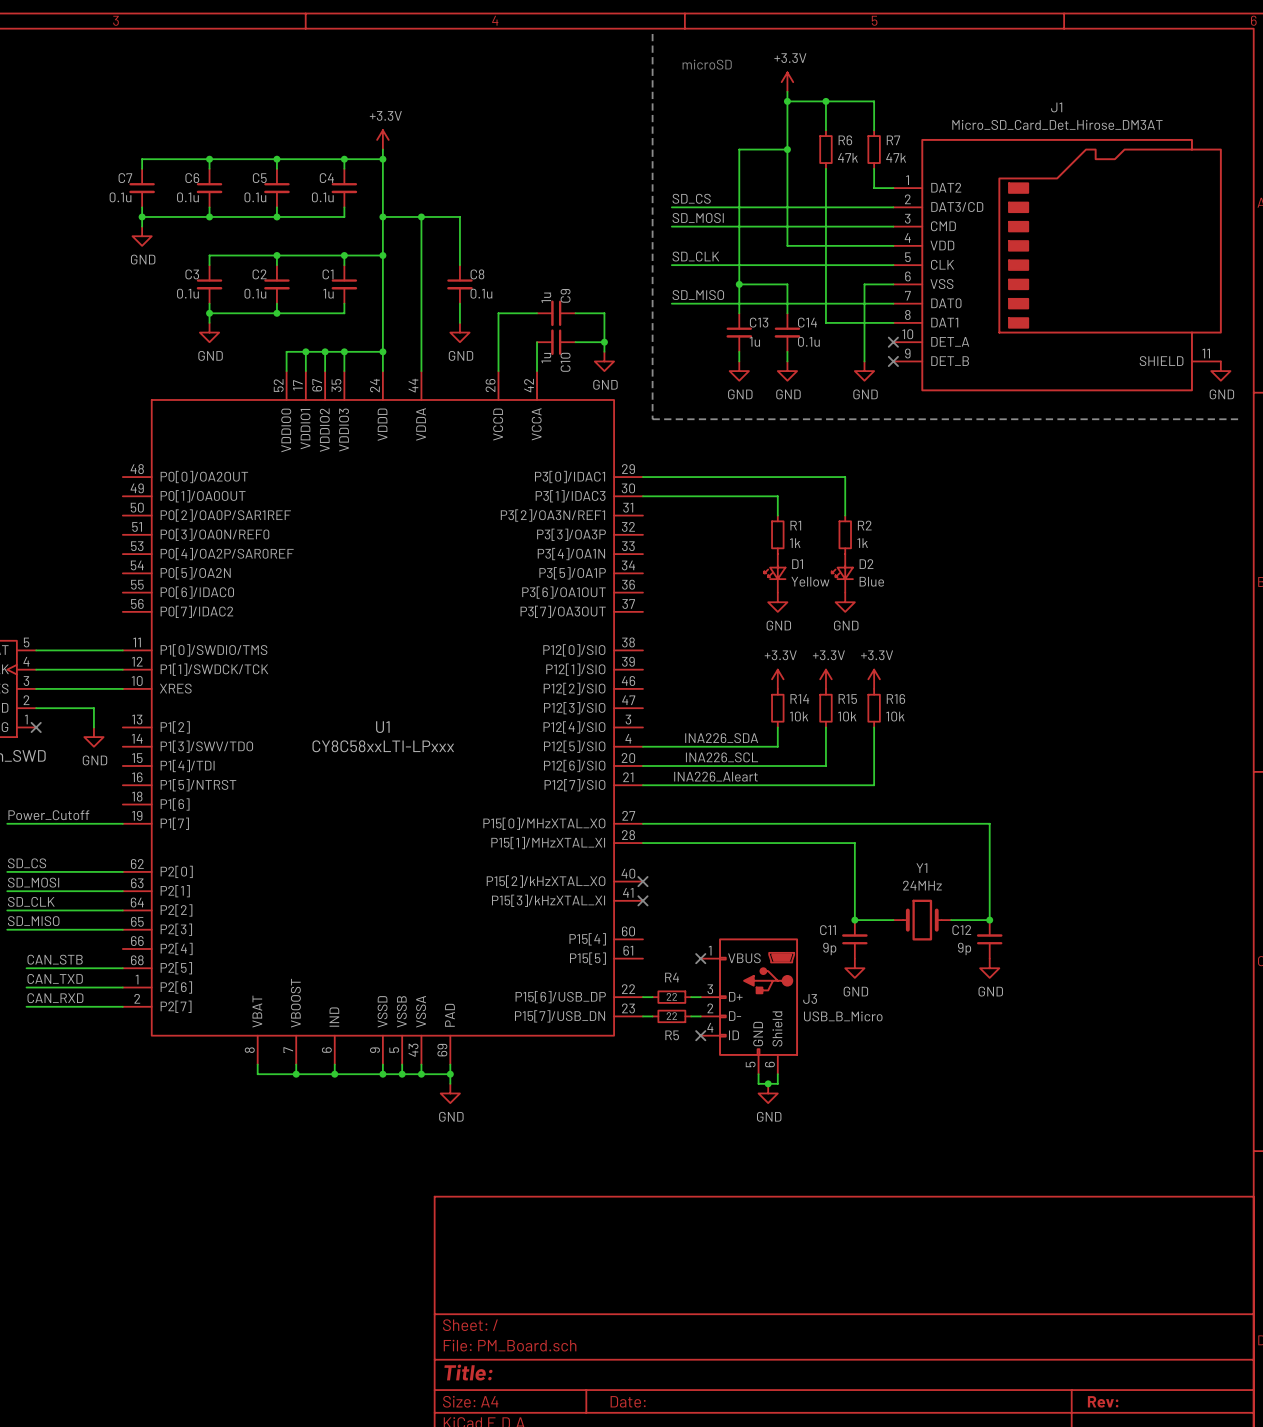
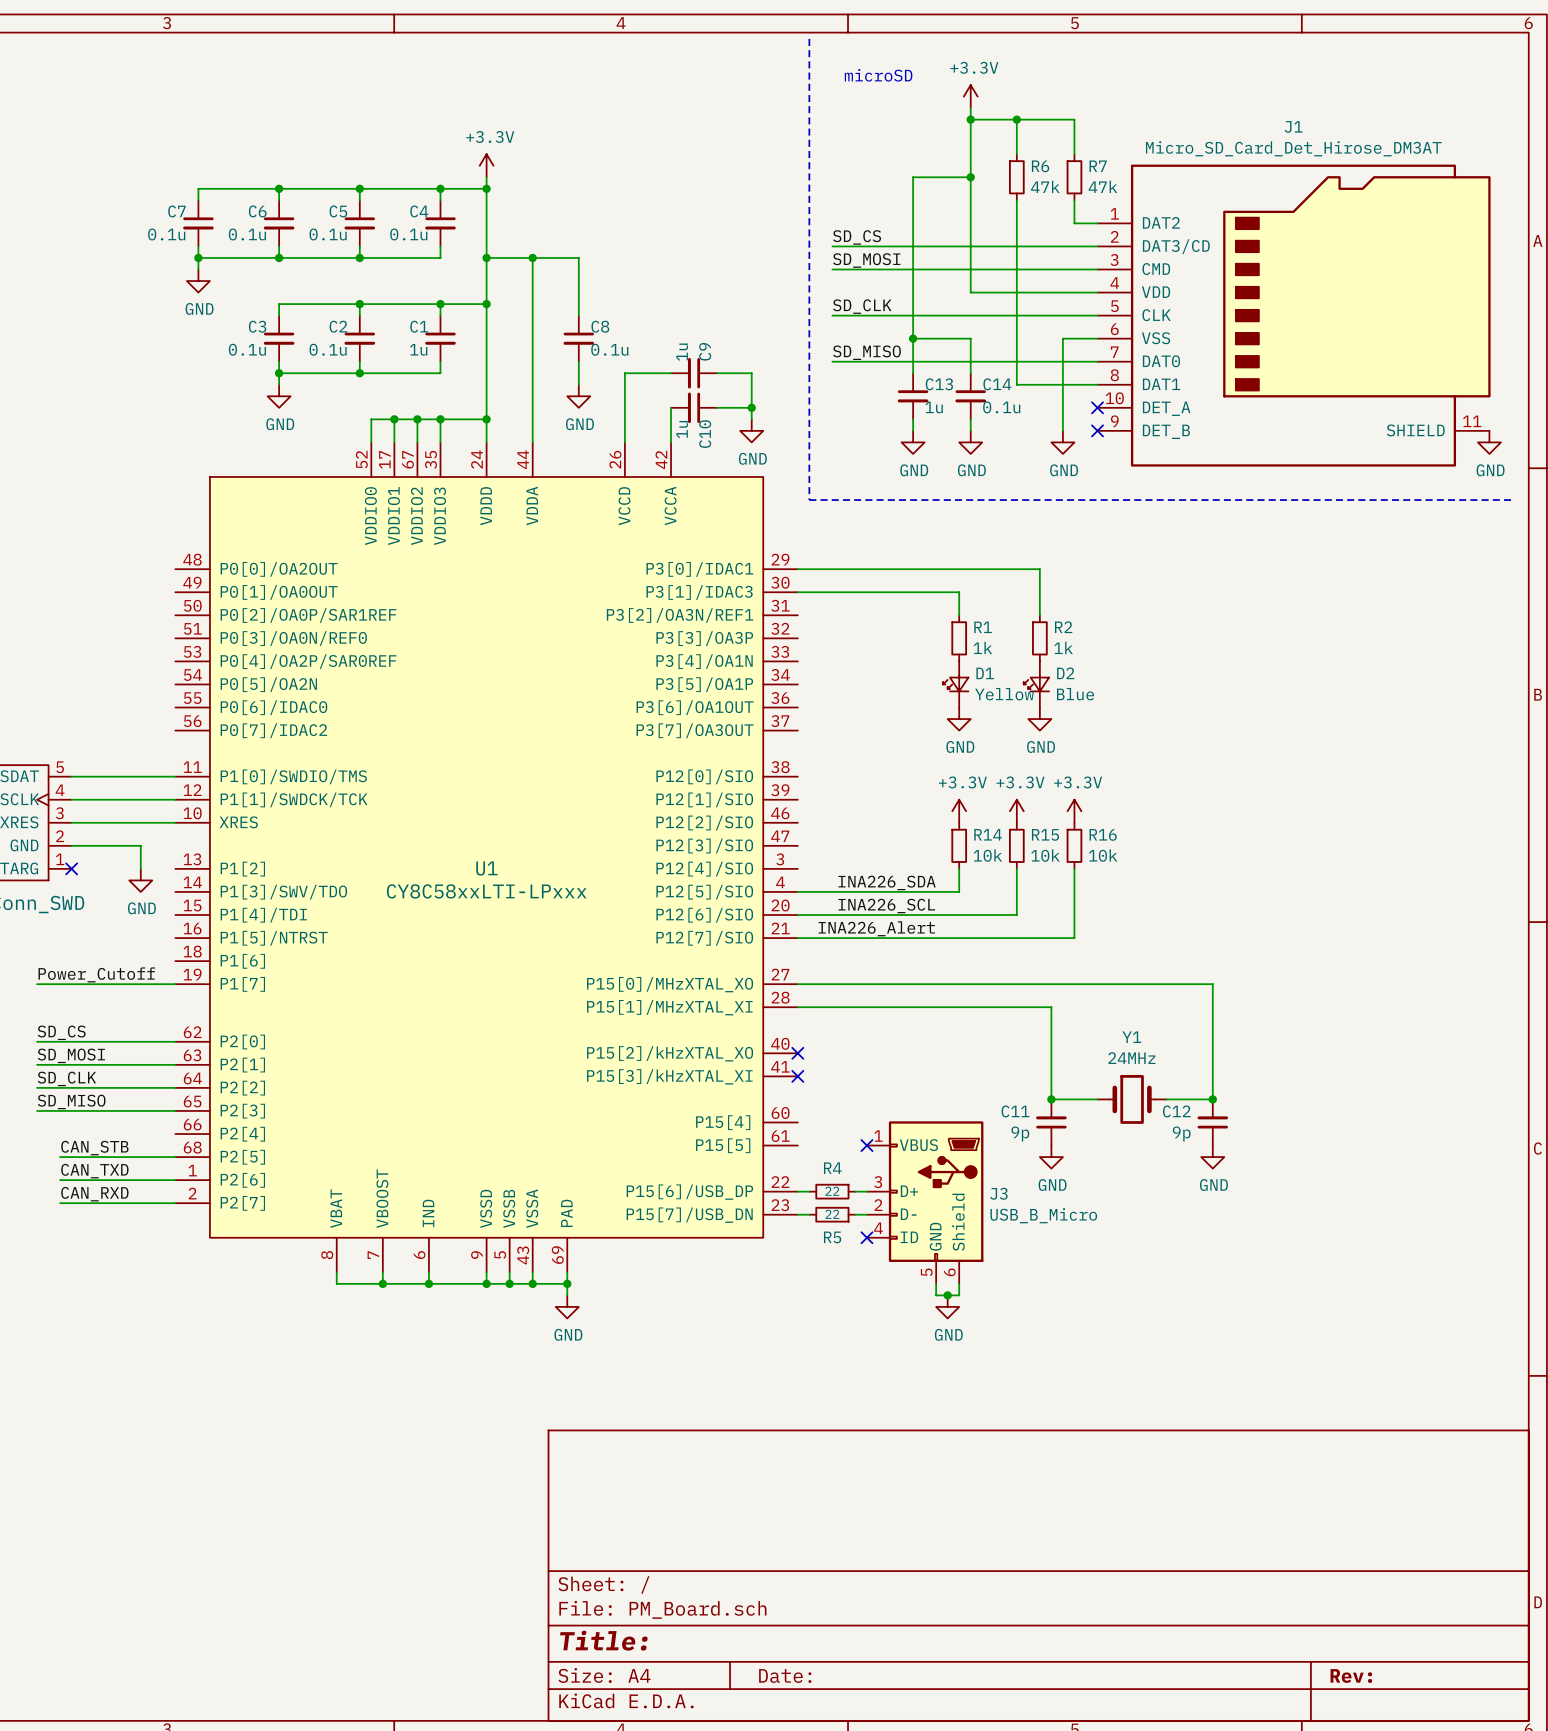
label: INA226_Aleart (715, 776) -> INA226_Alert (876, 928)

